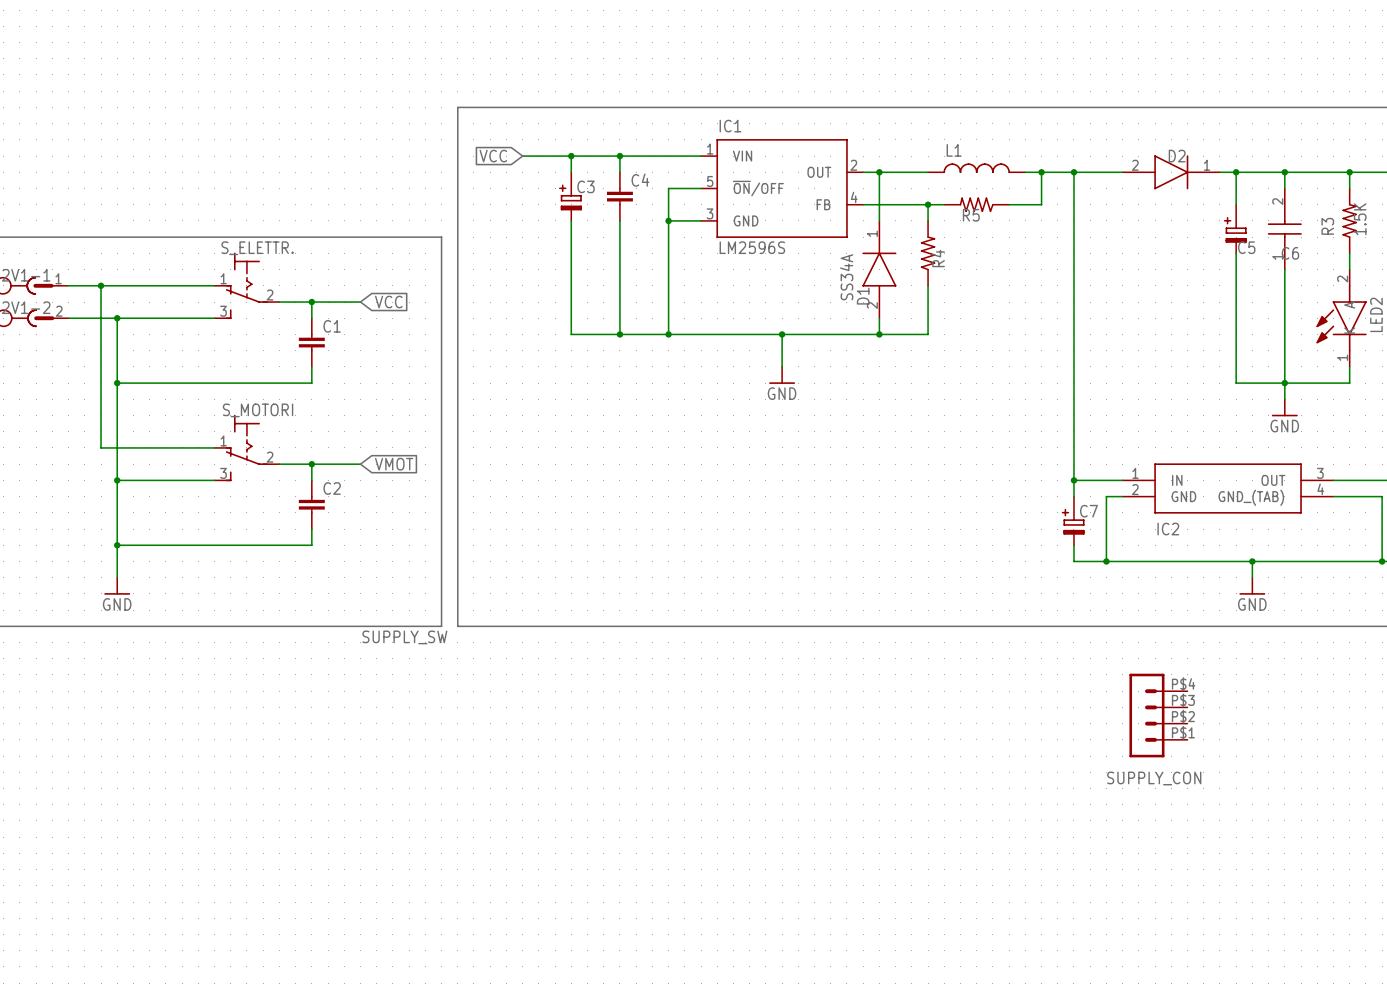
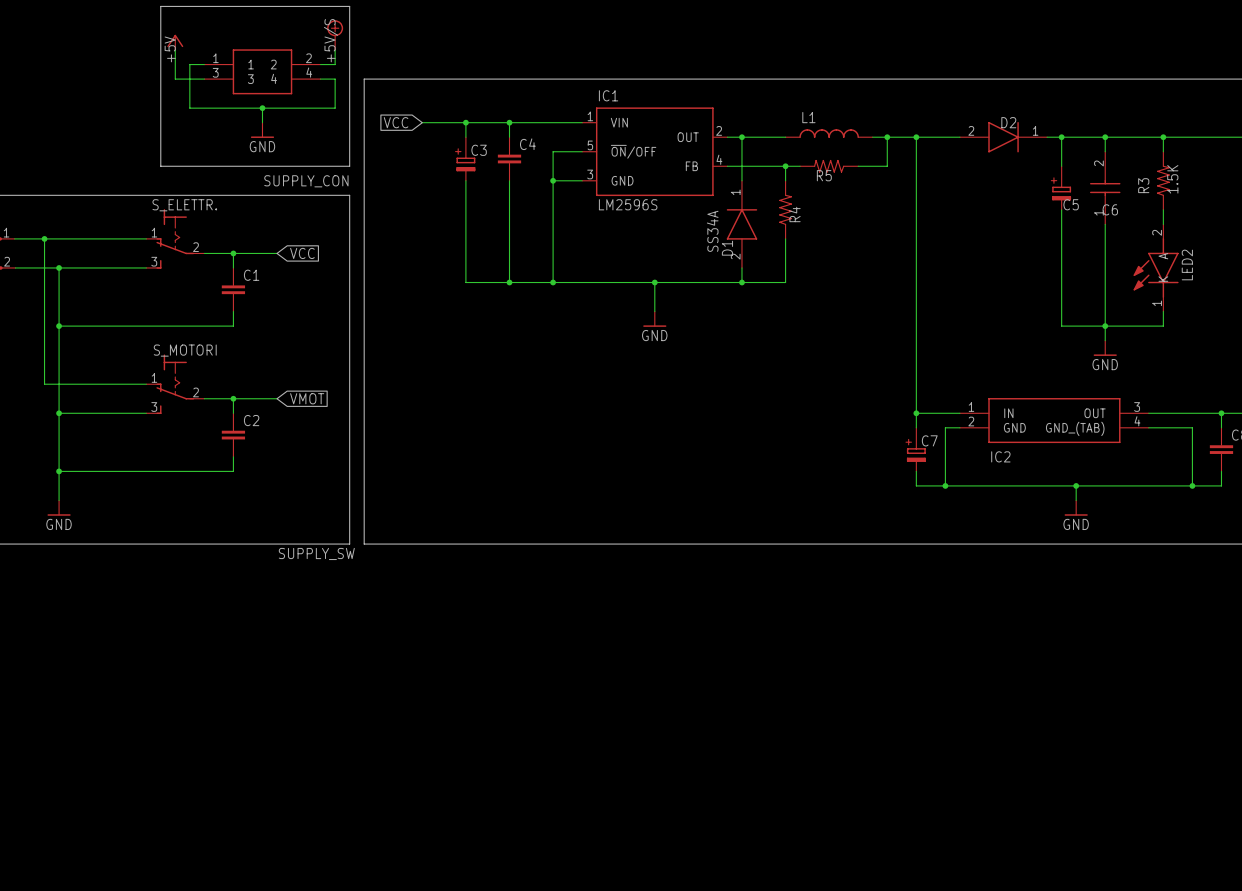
line: none -> (160, 6) (349, 6) (349, 166) (160, 166) (160, 6)
power symbol: none -> (335, 35)
label: none -> +5V/S (331, 40)
power symbol: none -> +5V (175, 42)
wire: none -> (175, 50) (175, 79) (204, 79)
wire: none -> (335, 50) (335, 64) (320, 64)
wire: none -> (204, 64) (189, 64) (189, 108) (335, 108) (335, 79) (320, 79)
SUPPLY_CON: none -> (262, 71)
wire: none -> (262, 108) (262, 122)
junction: none -> (262, 108)
power symbol: none -> GND (262, 130)
SUPPLY_CON: (1158, 715) -> none

